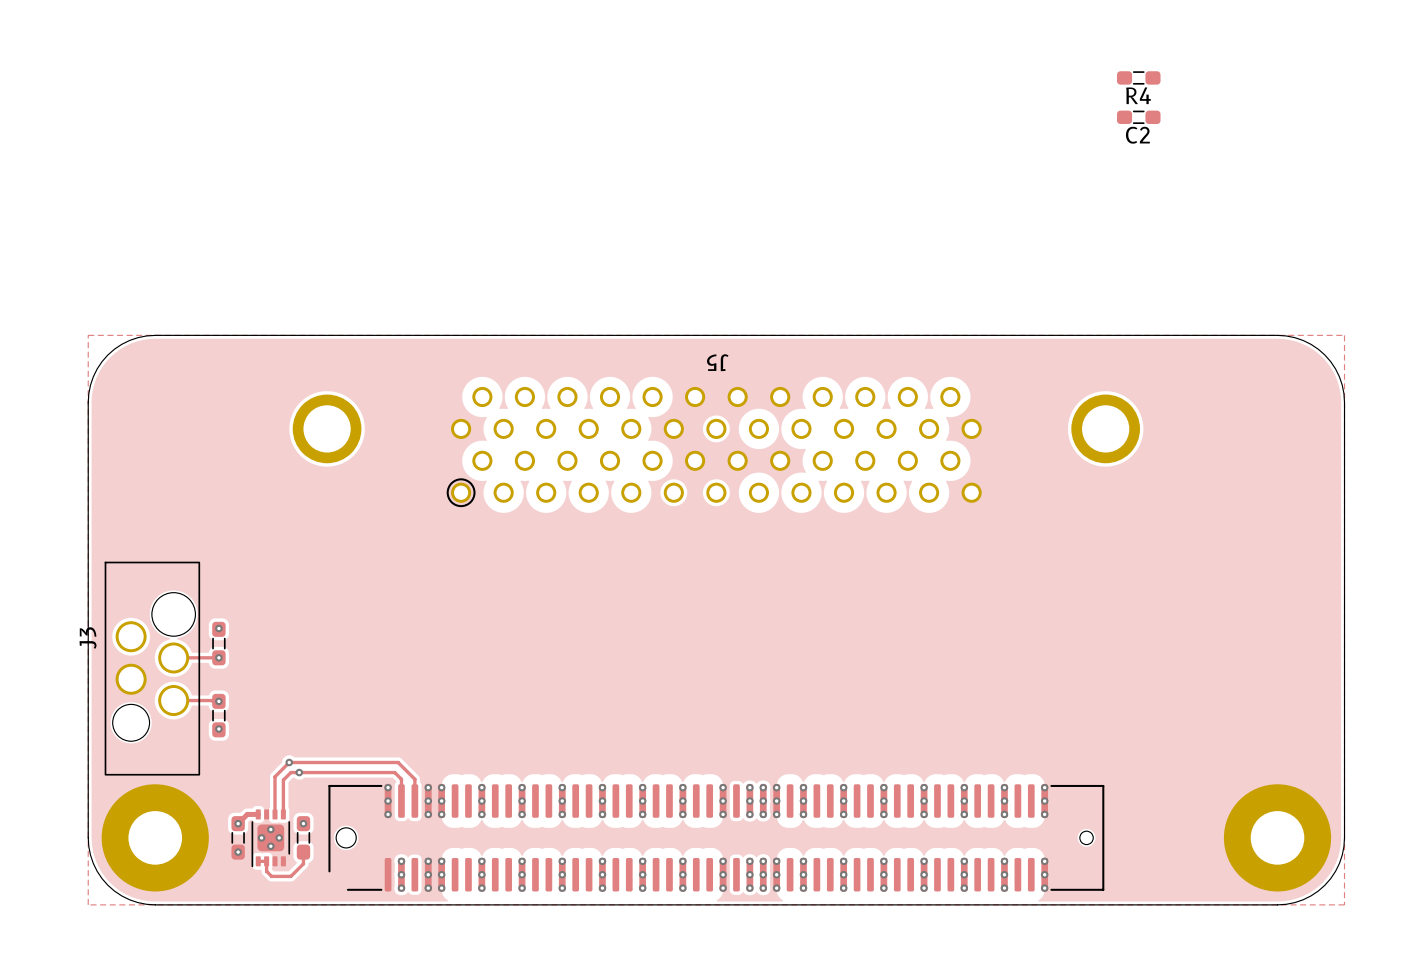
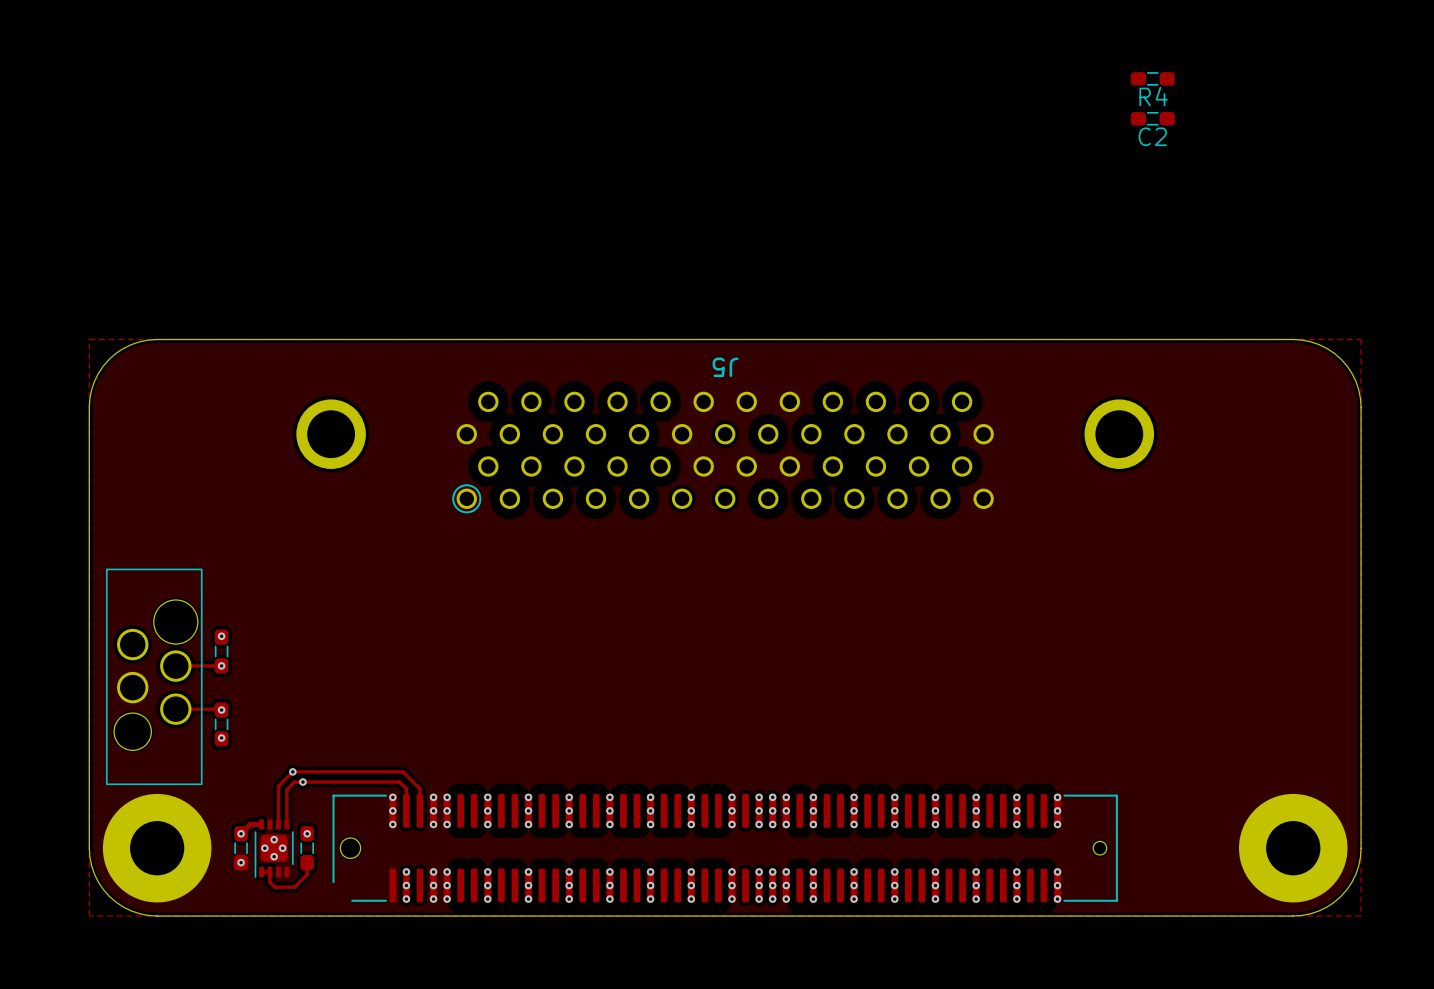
J3 name: J3 (88, 638) -> none

